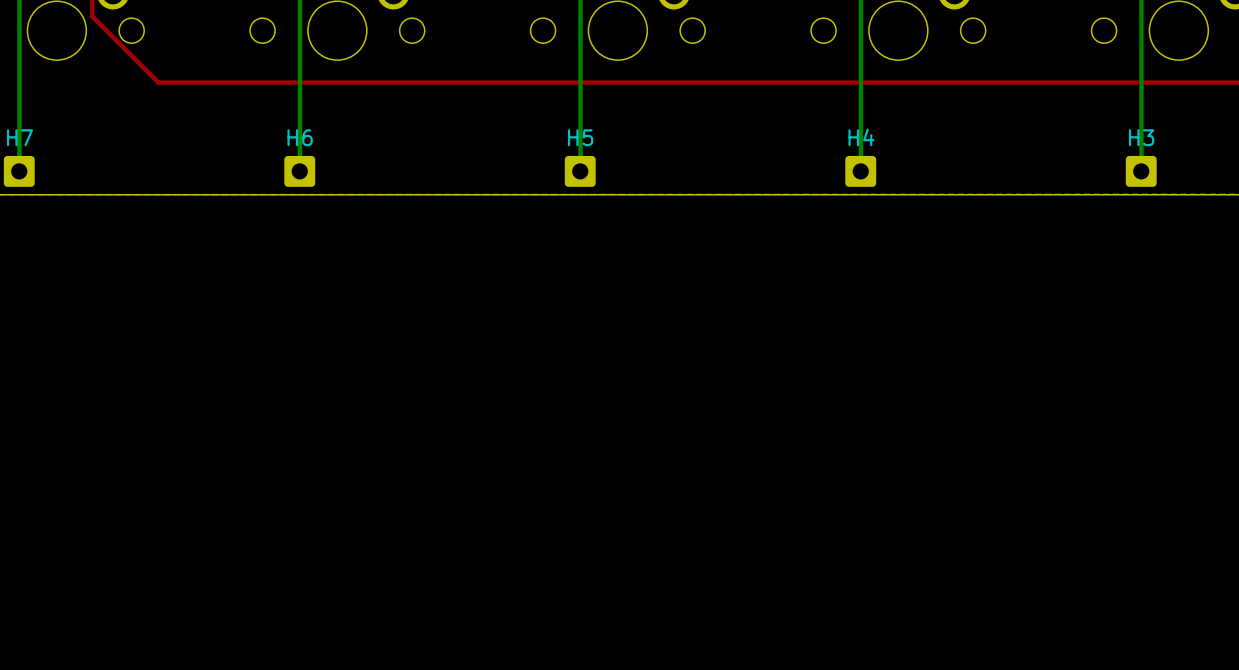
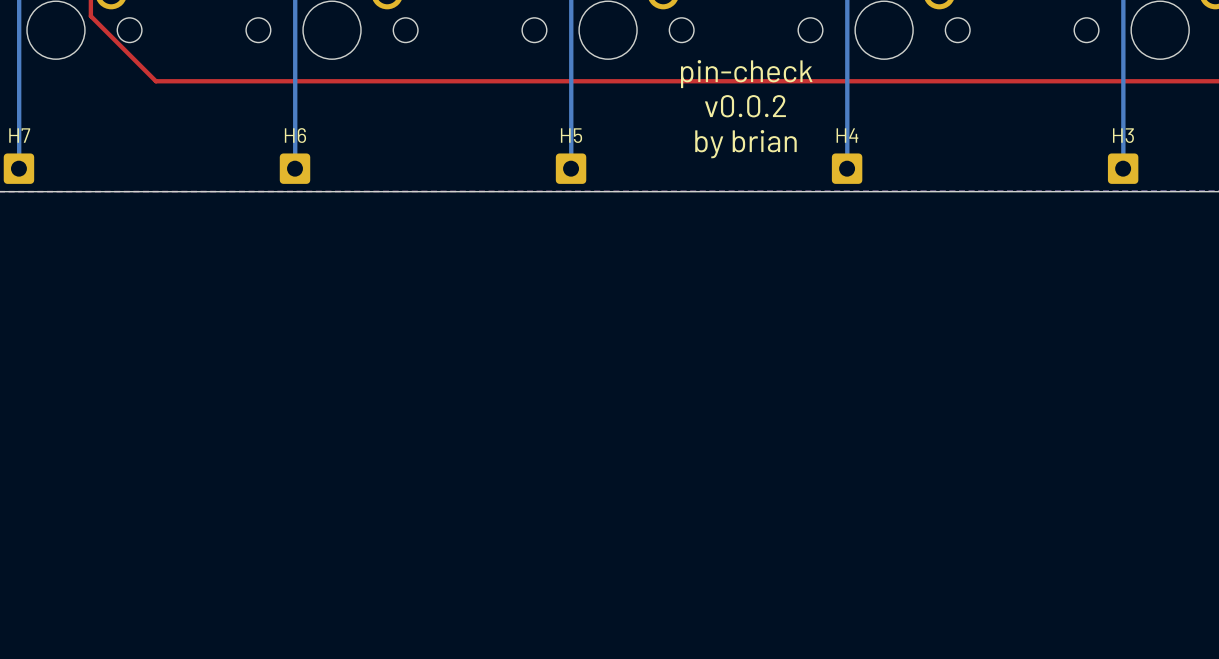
text: none -> pin-check (746, 74)
text: none -> v0.0.2 (745, 106)
text: none -> by brian (745, 144)

